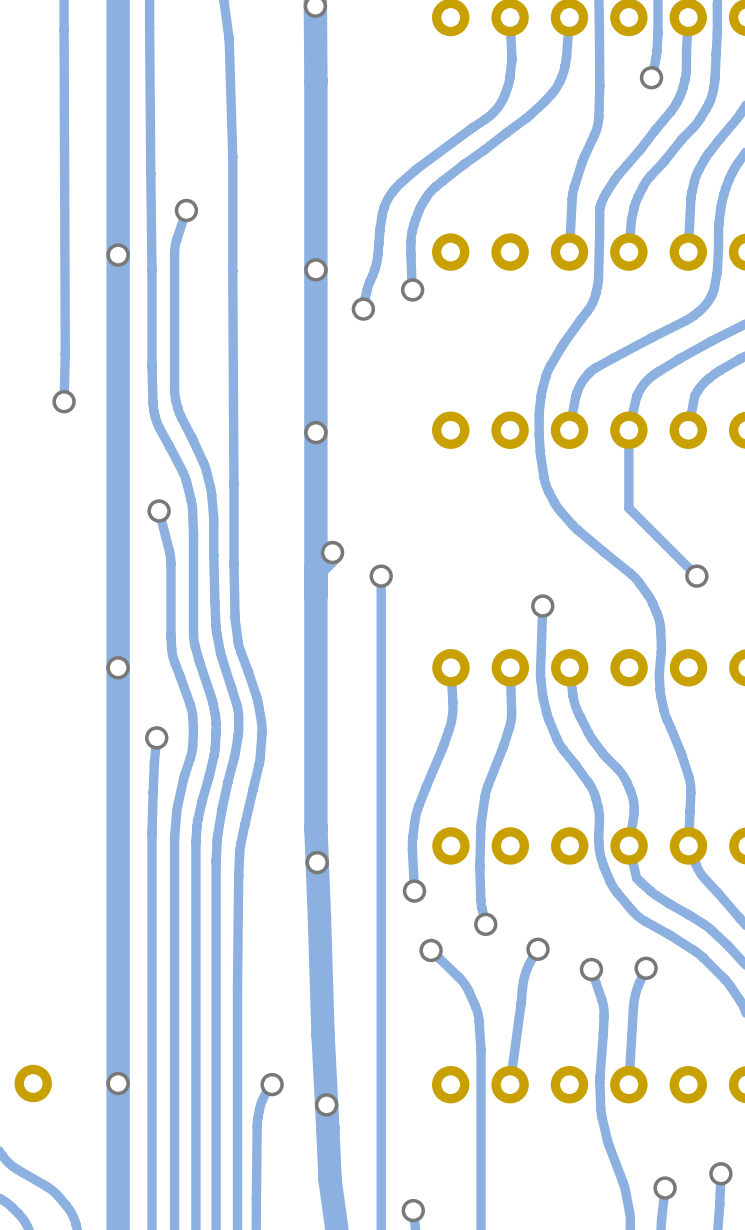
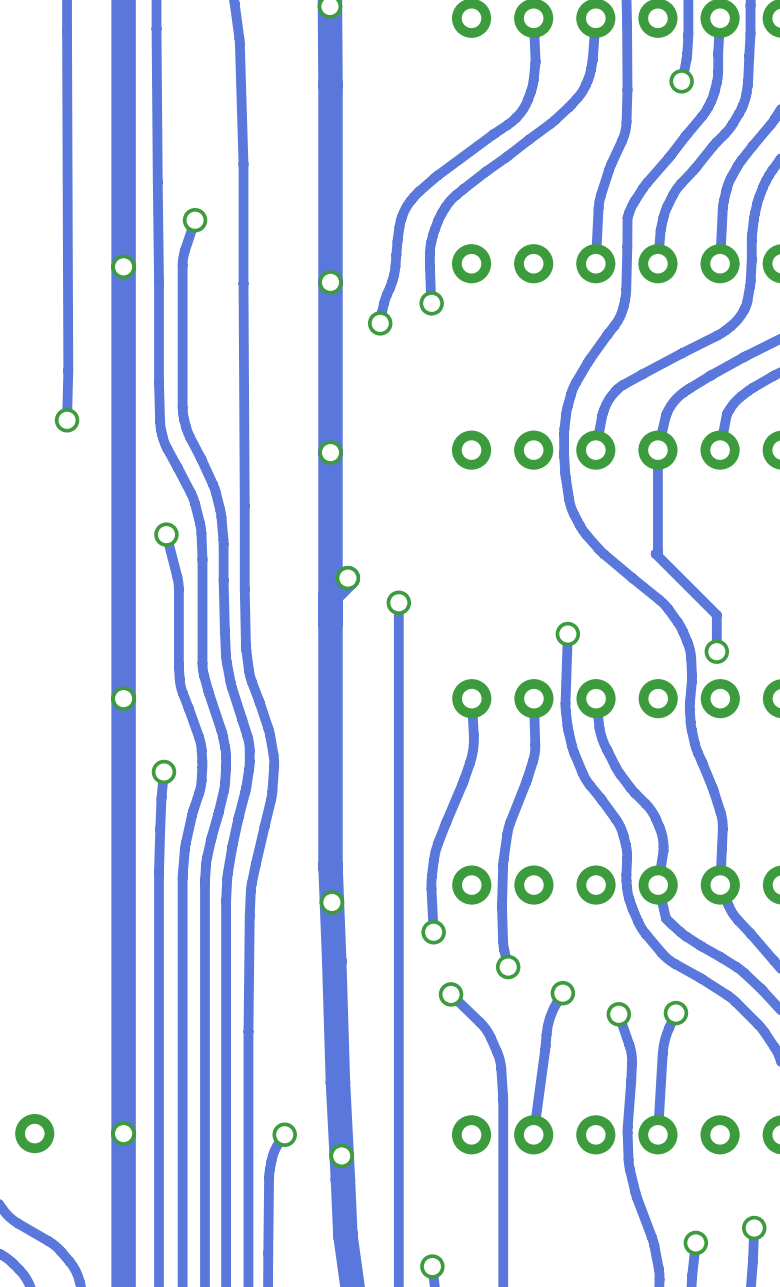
track: (628, 508) (696, 576) -> (657, 531) (657, 551) (655, 553) (716, 614) (716, 651)
via: (696, 576) -> none
via: none -> (716, 651)

